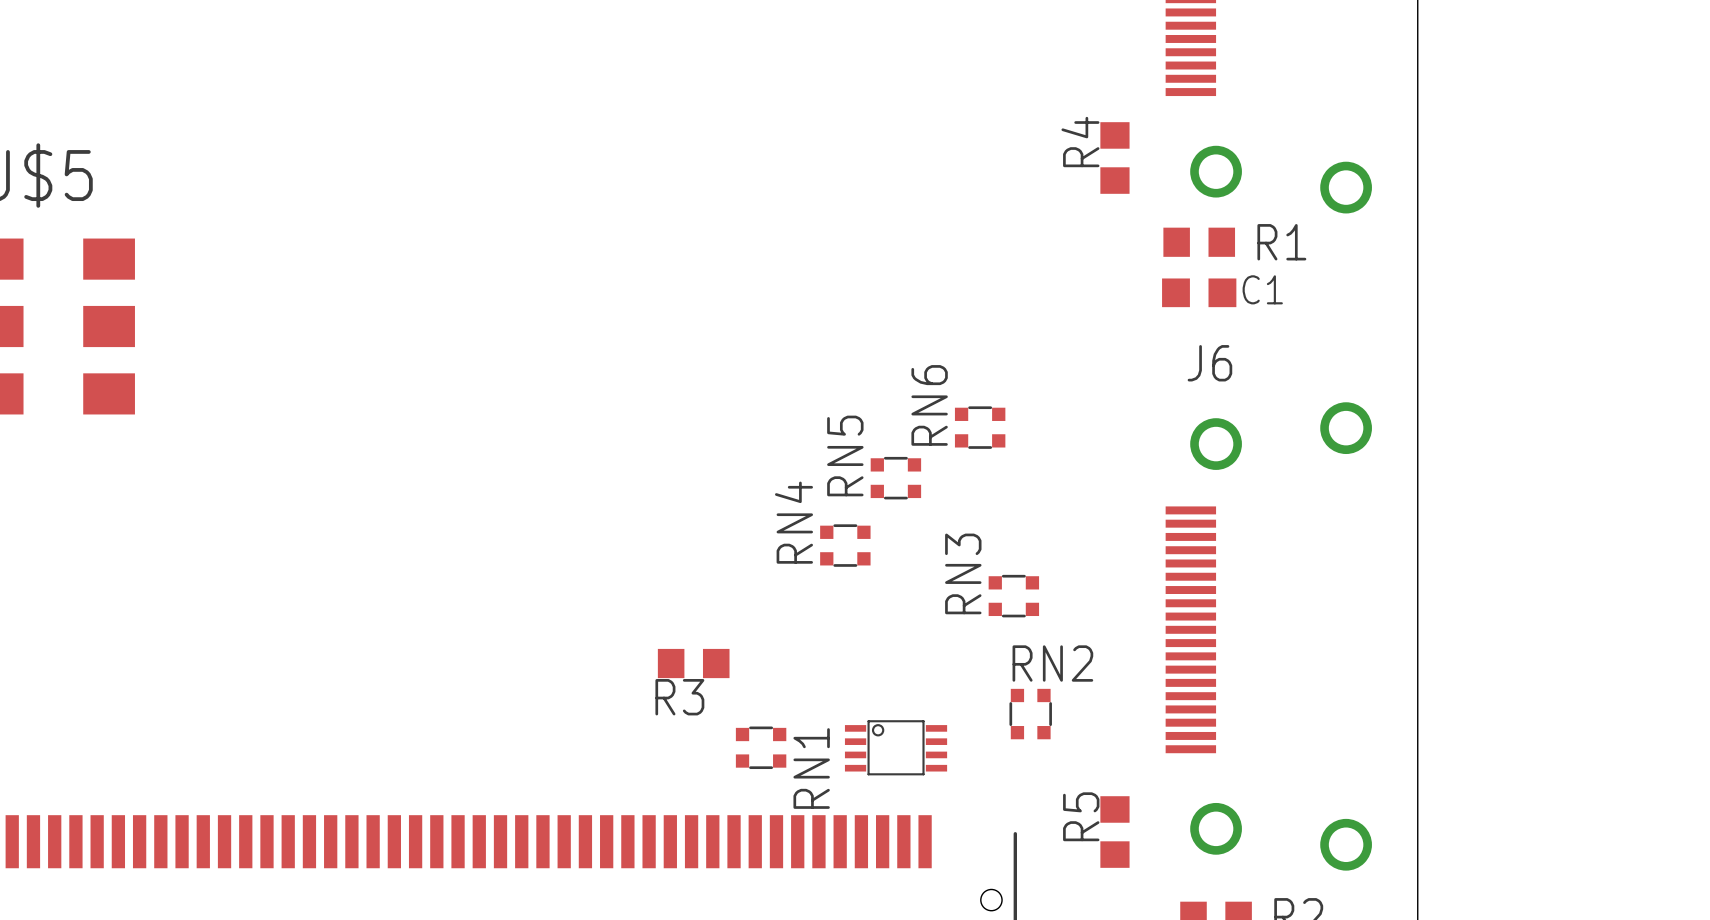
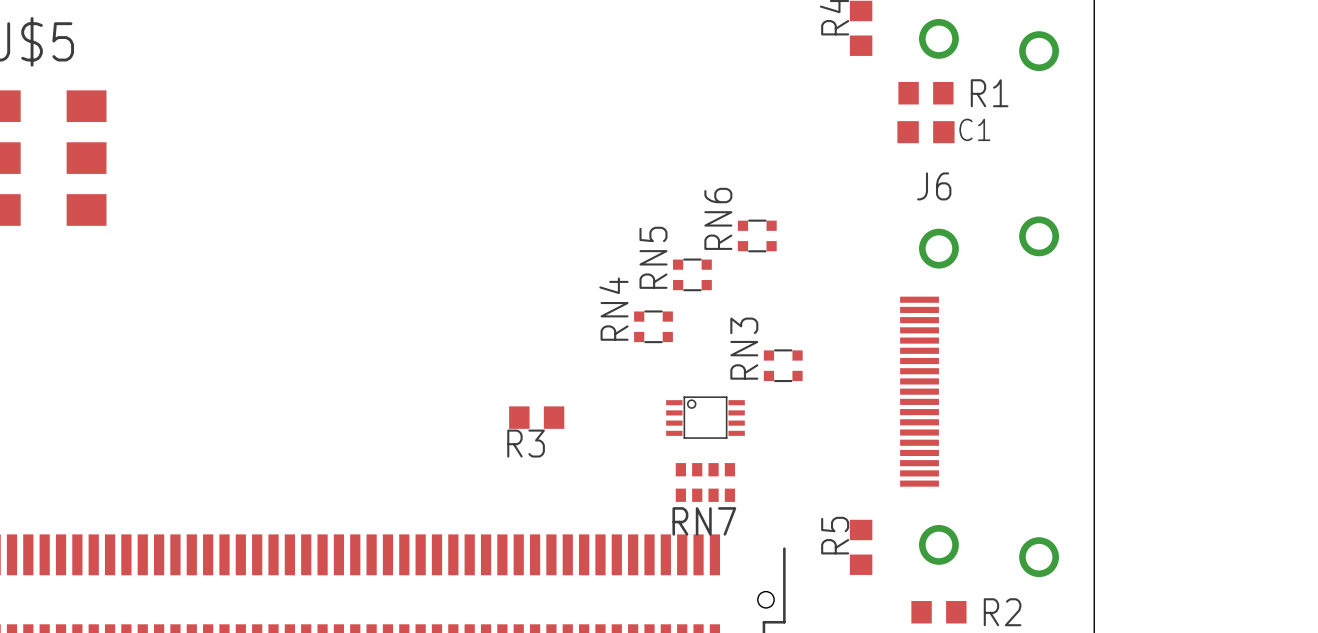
RN2: (1030, 714) -> none
RN1: (761, 747) -> none
part position: (896, 747) -> (705, 417)
RN7: none -> (705, 482)

